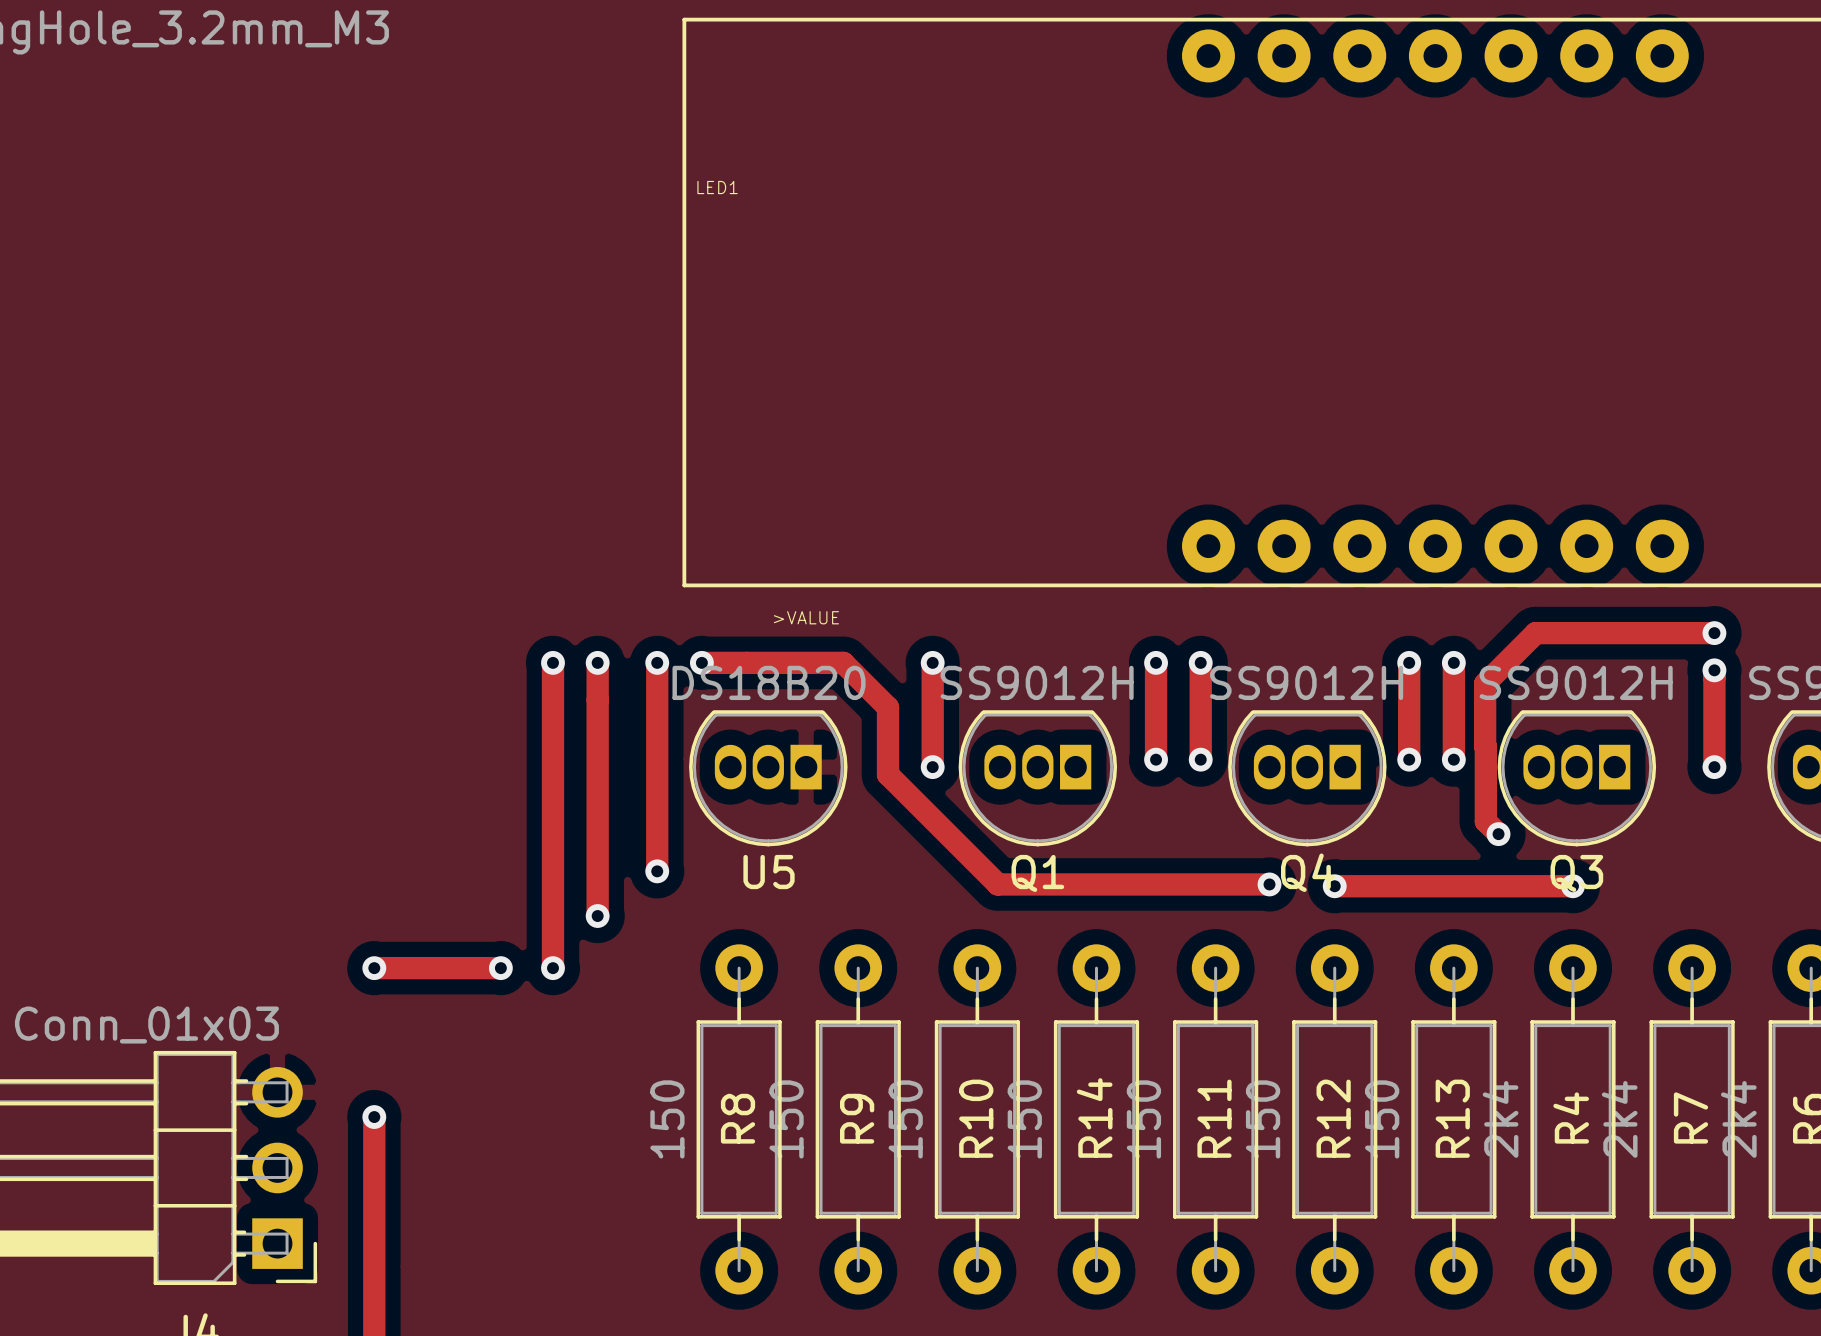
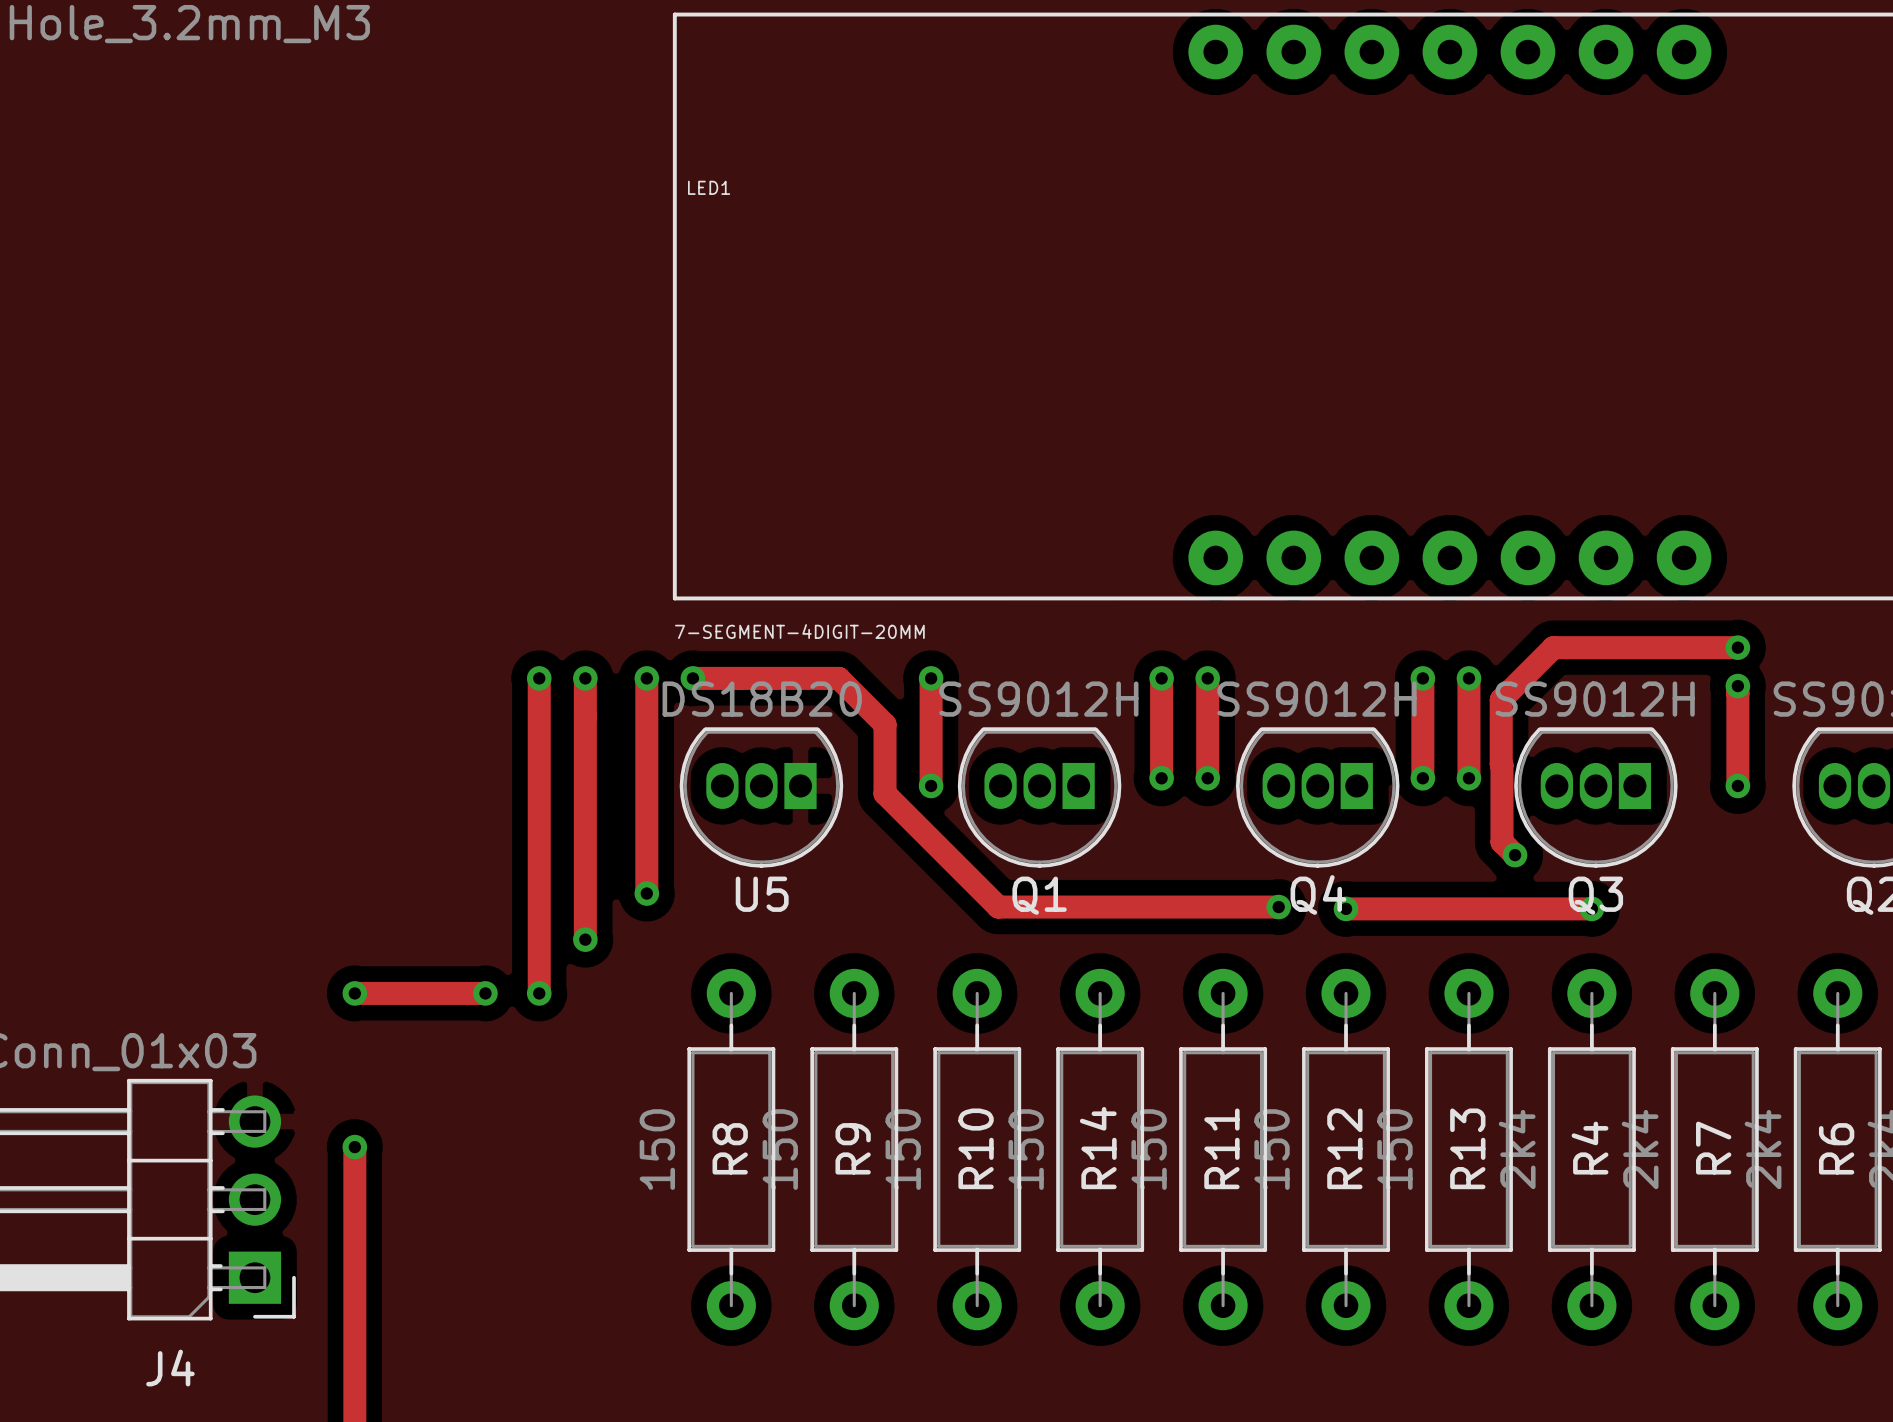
LED1 value: >VALUE (806, 617) -> 7-SEGMENT-4DIGIT-20MM (799, 631)

